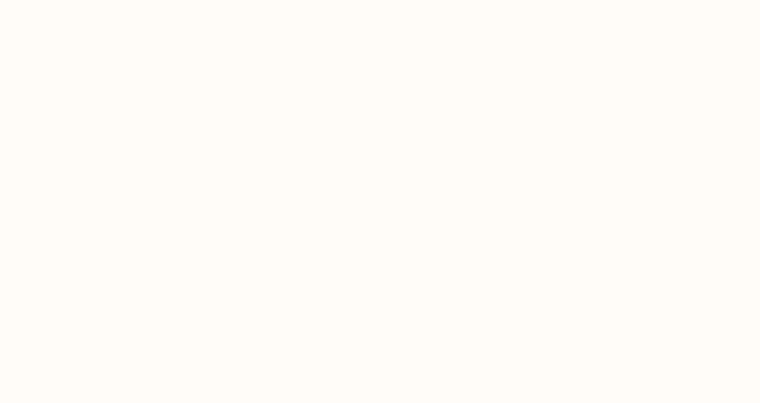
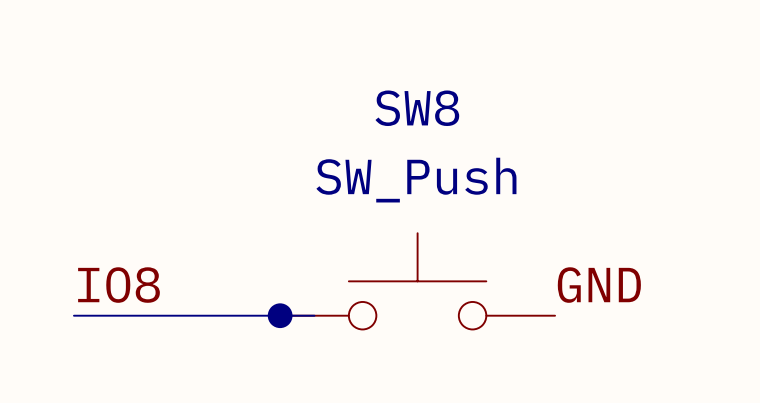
SW8: none -> SW_Push (417, 281)
label: none -> IO8 (118, 285)
label: none -> GND (599, 285)
wire: none -> (73, 315) (314, 315)
junction: none -> (280, 315)

